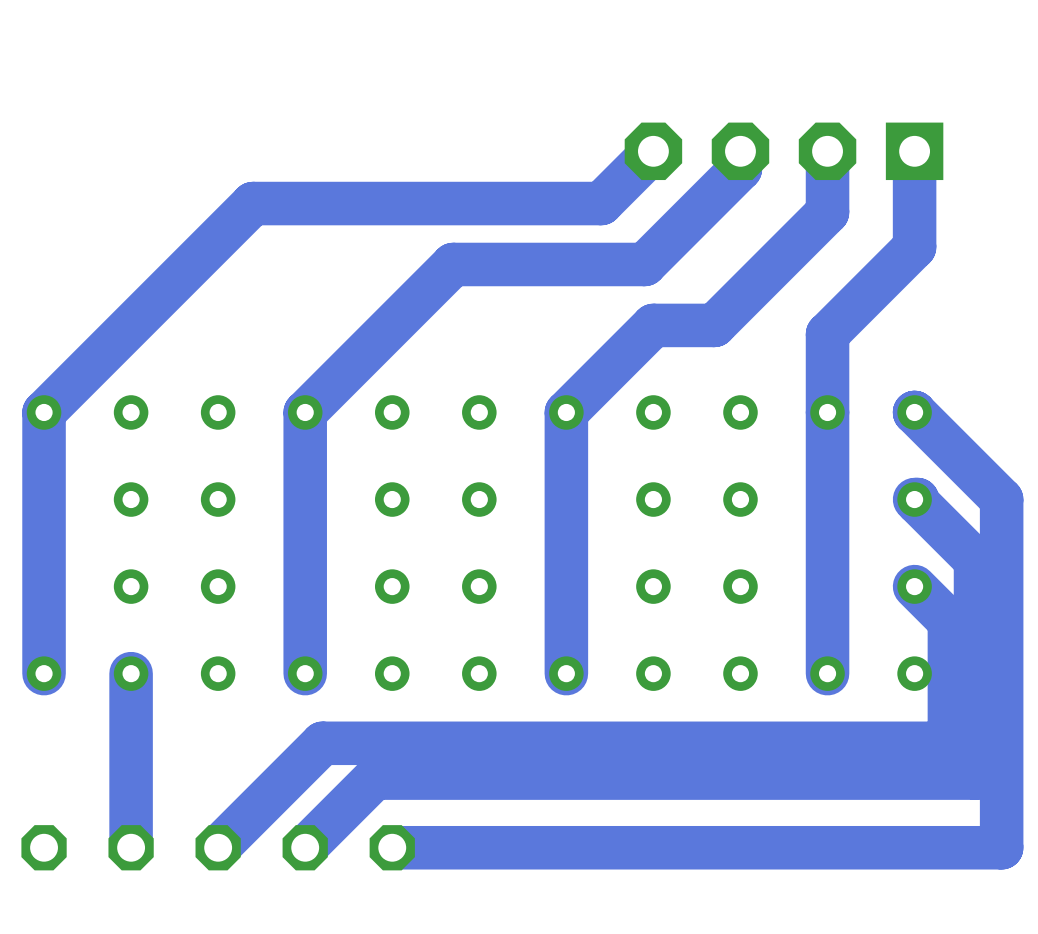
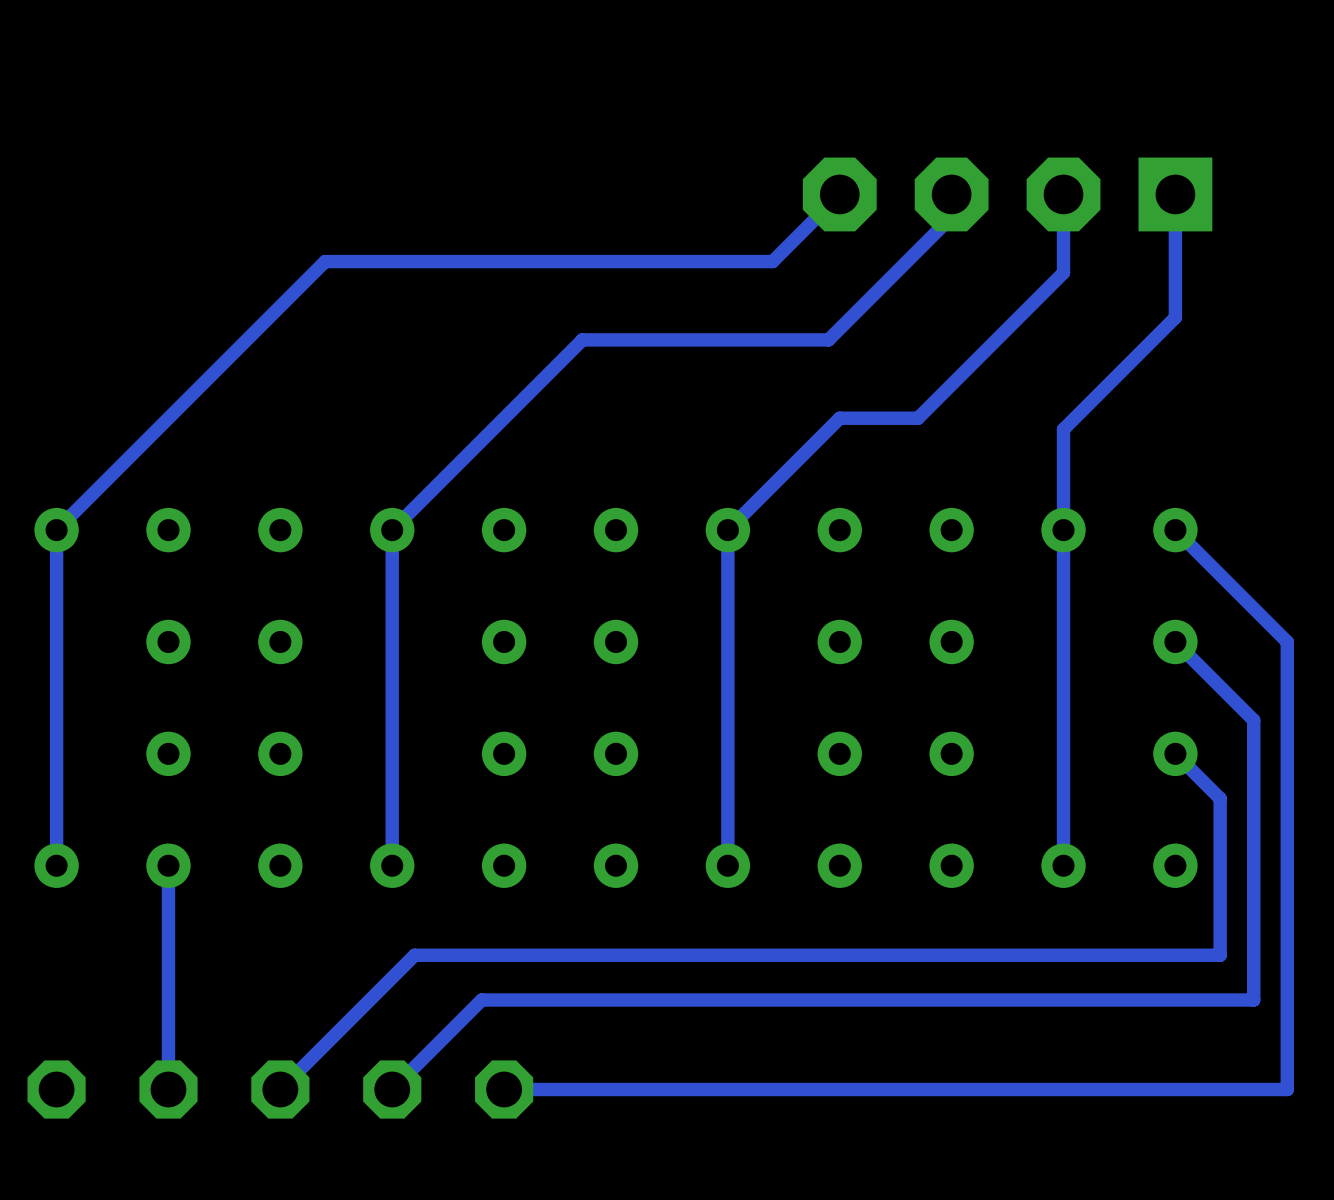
track width: thick (653, 151) (601, 203) (252, 203) (44, 412) (44, 673) -> thin (839, 194) (772, 261) (325, 261) (56, 530) (56, 865)
track width: thick (740, 151) (740, 168) (644, 264) (453, 264) (305, 412) (305, 673) -> thin (951, 194) (951, 216) (828, 339) (582, 339) (392, 530) (392, 865)
track width: thick (827, 151) (827, 212) (714, 325) (653, 325) (566, 412) (566, 673) -> thin (1063, 194) (1063, 272) (918, 418) (839, 418) (727, 530) (727, 865)
track width: thick (914, 151) (914, 247) (827, 334) (827, 673) -> thin (1175, 194) (1175, 317) (1063, 429) (1063, 865)
track width: thick (914, 412) (1001, 499) (1001, 847) (392, 847) -> thin (1175, 530) (1287, 641) (1287, 1089) (504, 1089)
track width: thick (914, 499) (917, 499) (917, 502) (975, 560) (975, 778) (374, 778) (305, 847) -> thin (1175, 641) (1179, 641) (1179, 645) (1253, 720) (1253, 1000) (481, 1000) (392, 1089)
track width: thick (914, 586) (949, 621) (949, 743) (322, 743) (218, 847) -> thin (1175, 753) (1220, 798) (1220, 955) (414, 955) (280, 1089)
track width: thick (131, 673) (131, 847) -> thin (168, 865) (168, 1089)

